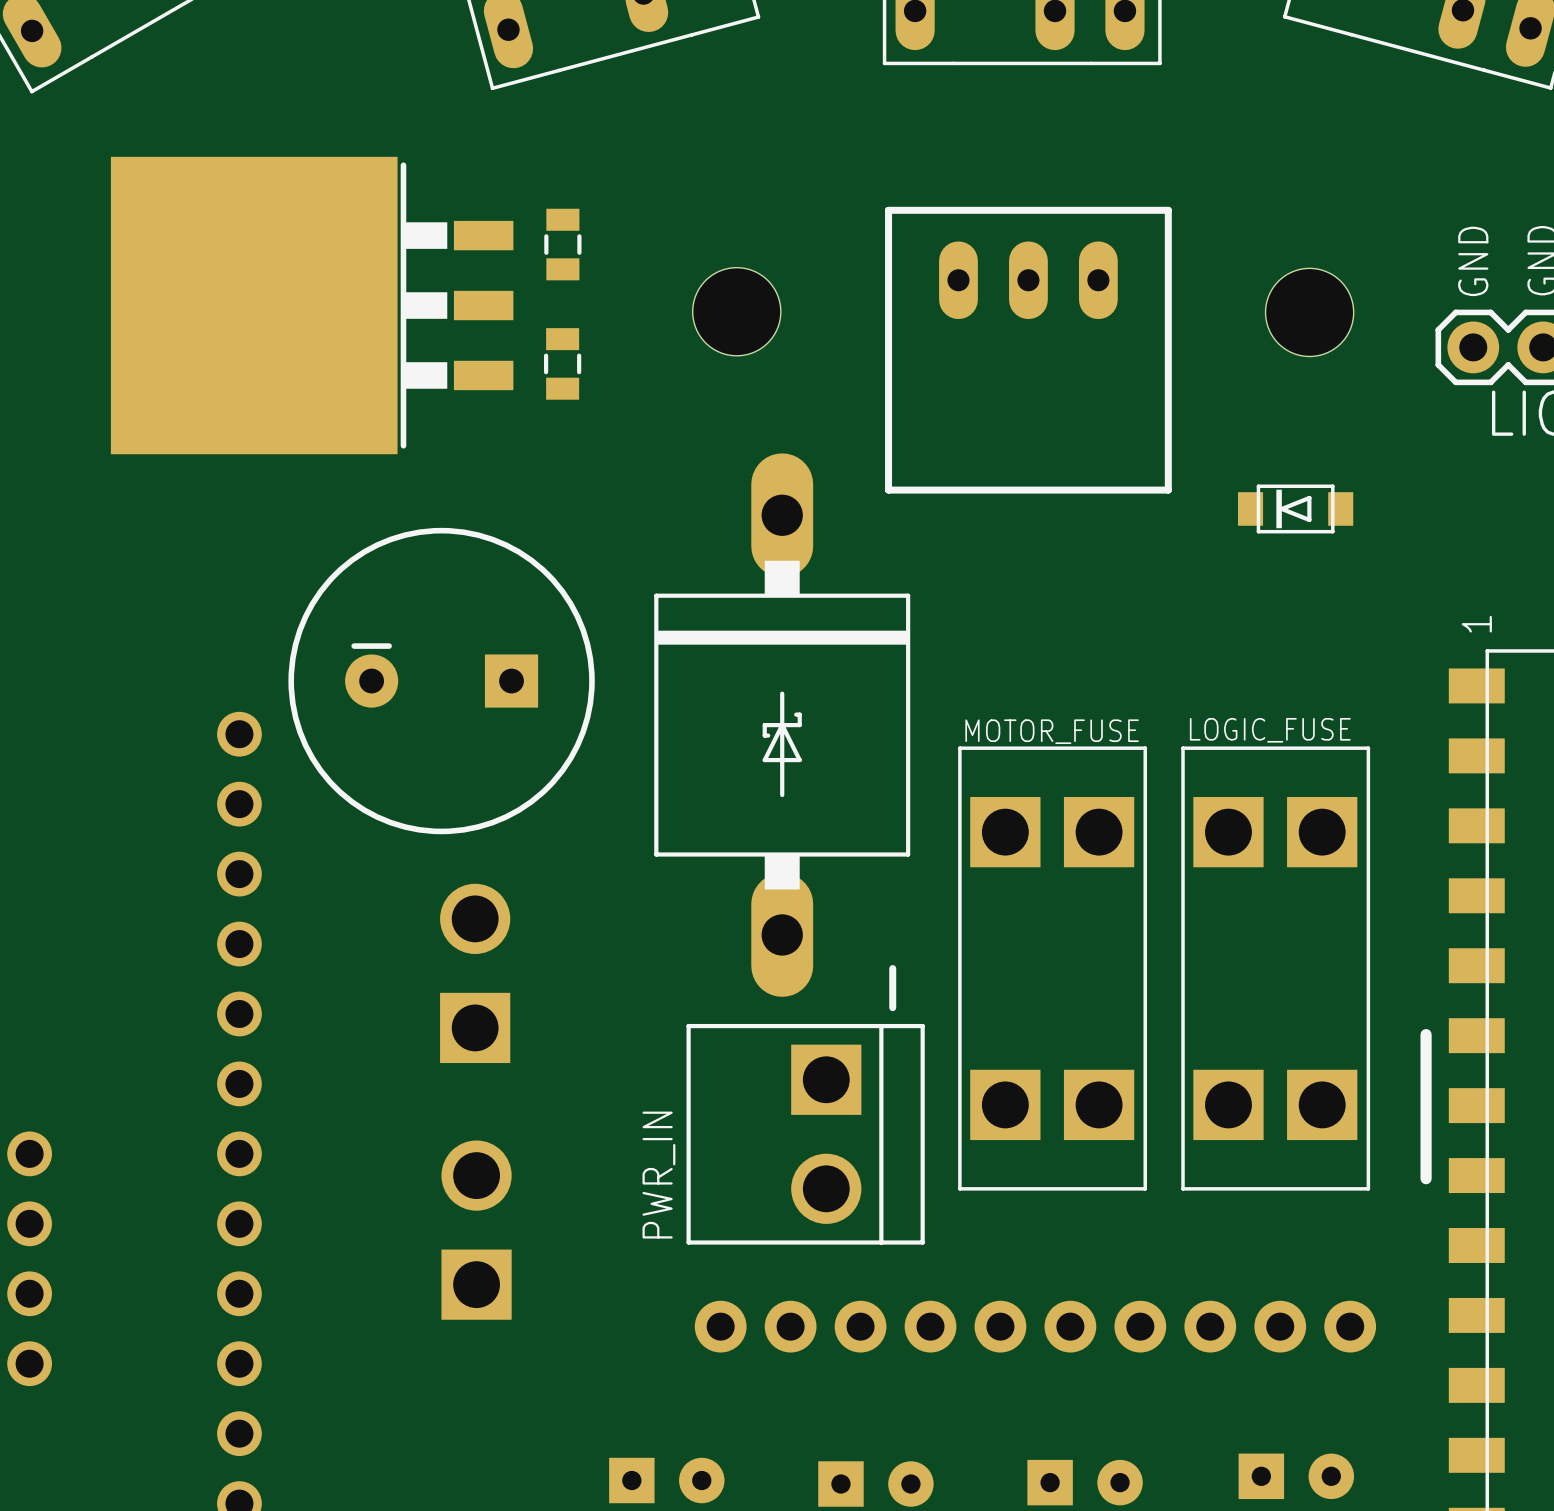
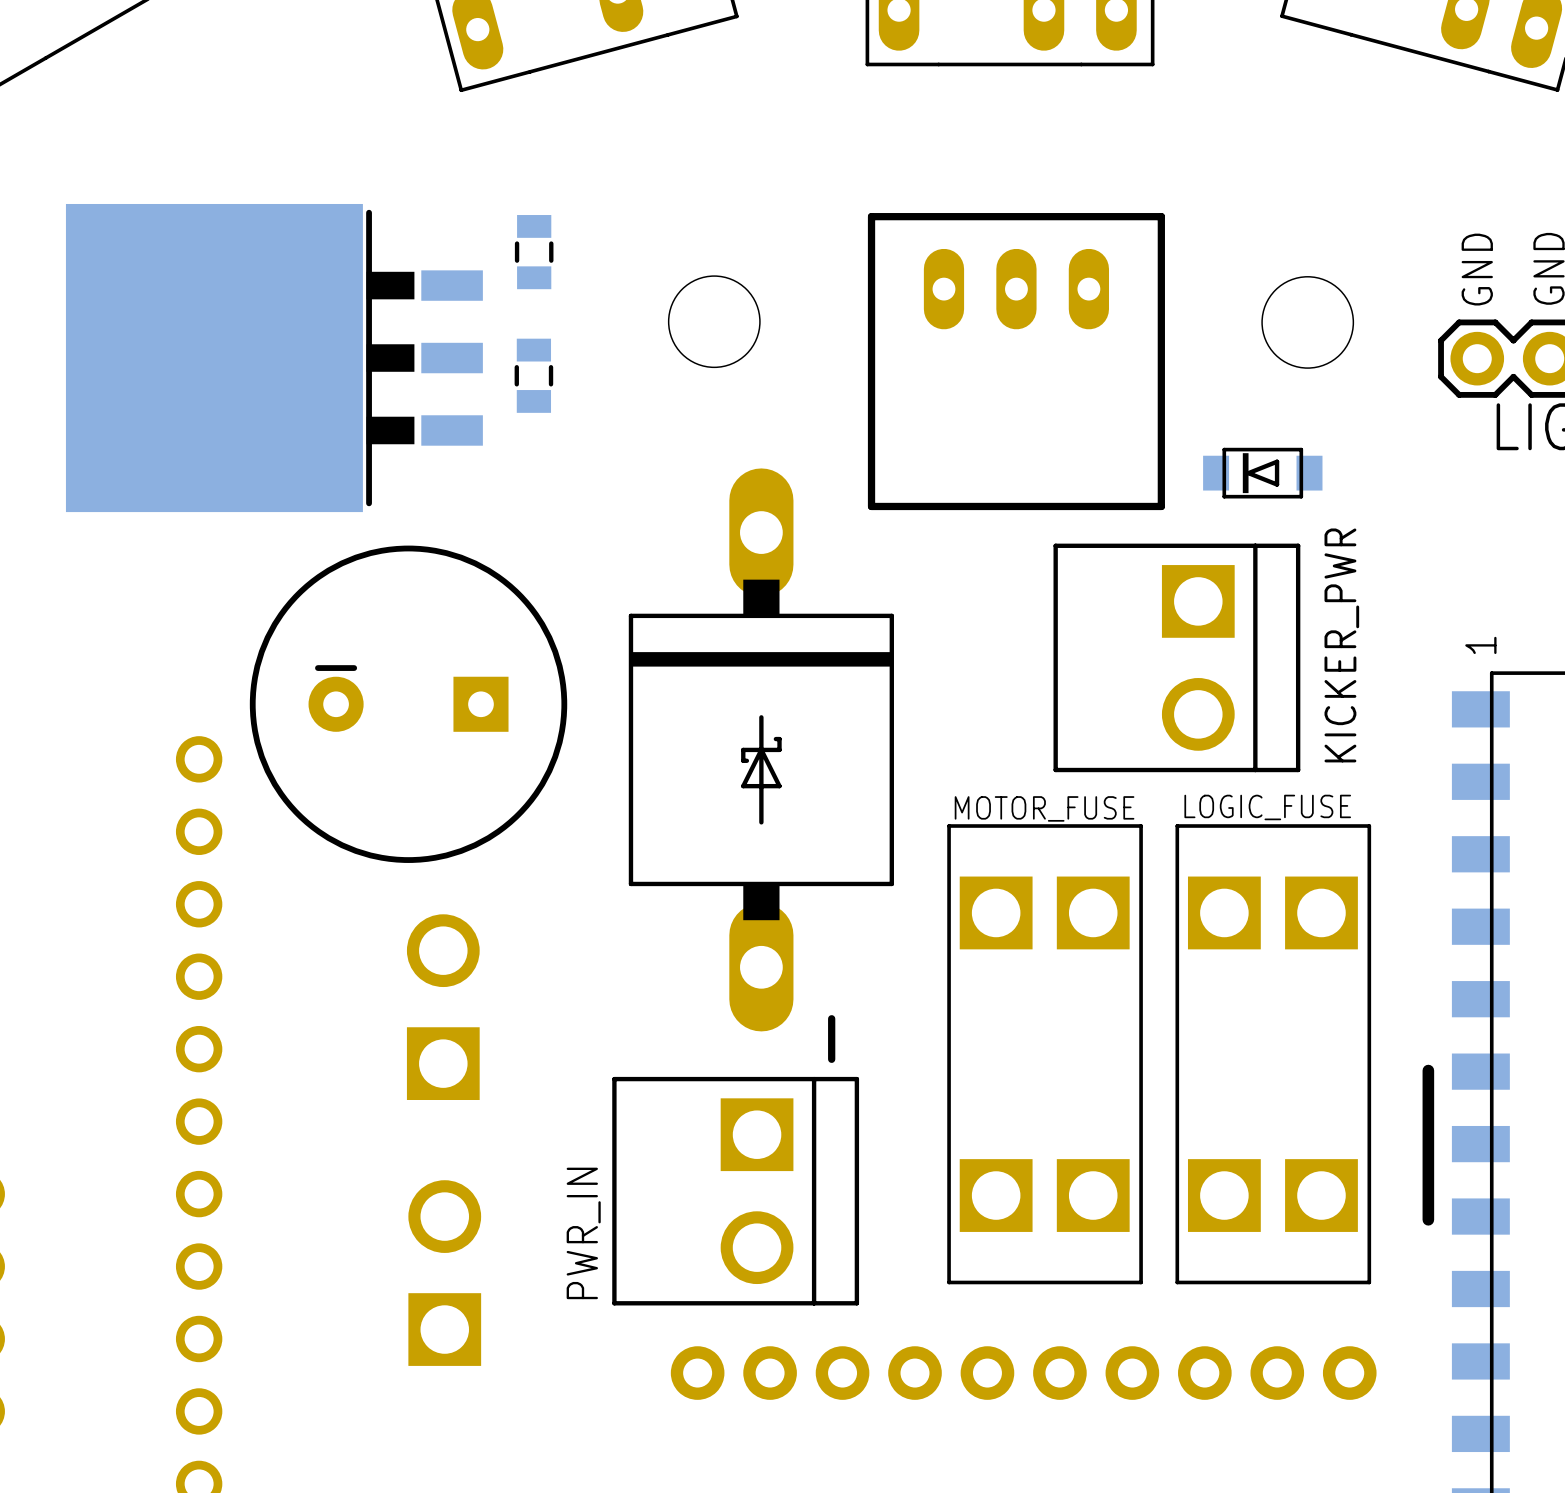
part position: (312, 305) -> (274, 358)
part position: (1295, 508) -> (1262, 473)
KICKER_PWR: none -> (1176, 657)
line: (892, 968) (892, 1007) -> (831, 1018) (831, 1059)
MOTOR_FUSE position: (1052, 968) -> (1045, 1054)
LOGIC_FUSE position: (1275, 968) -> (1273, 1054)
PWR_IN position: (805, 1134) -> (735, 1191)

